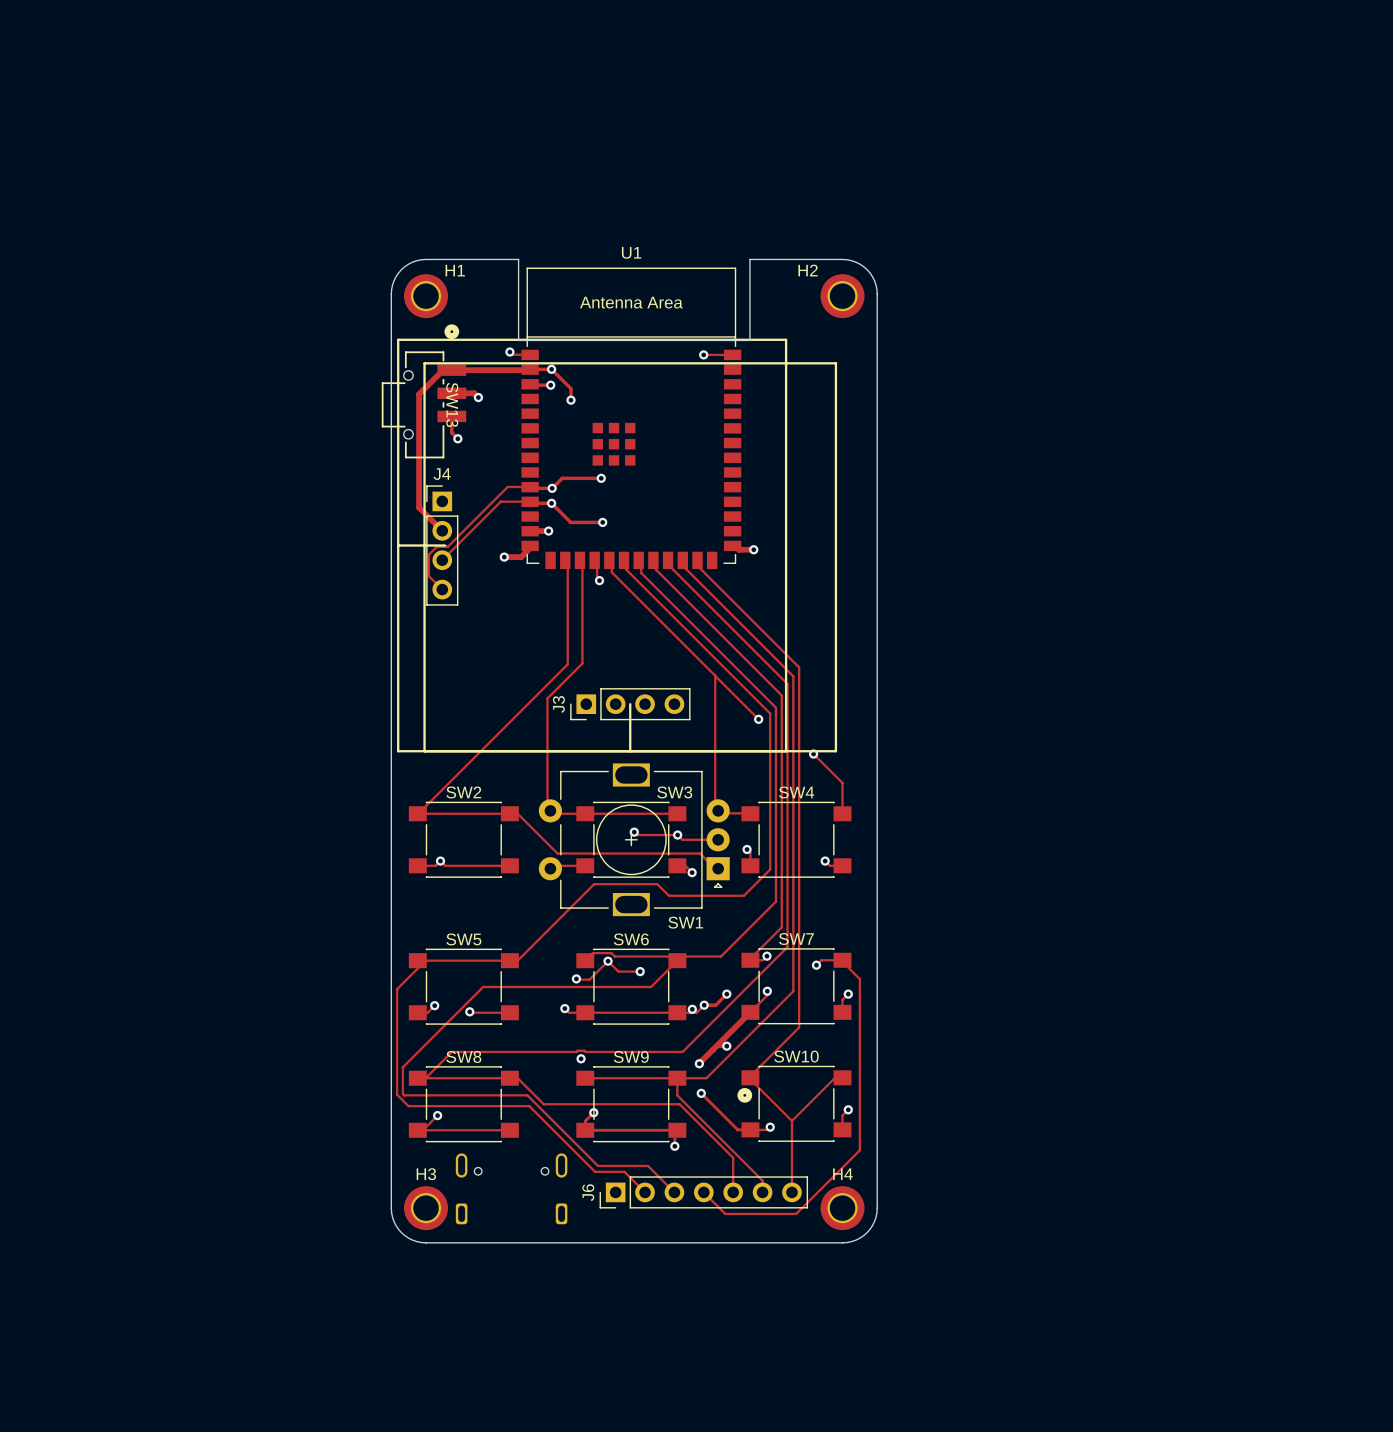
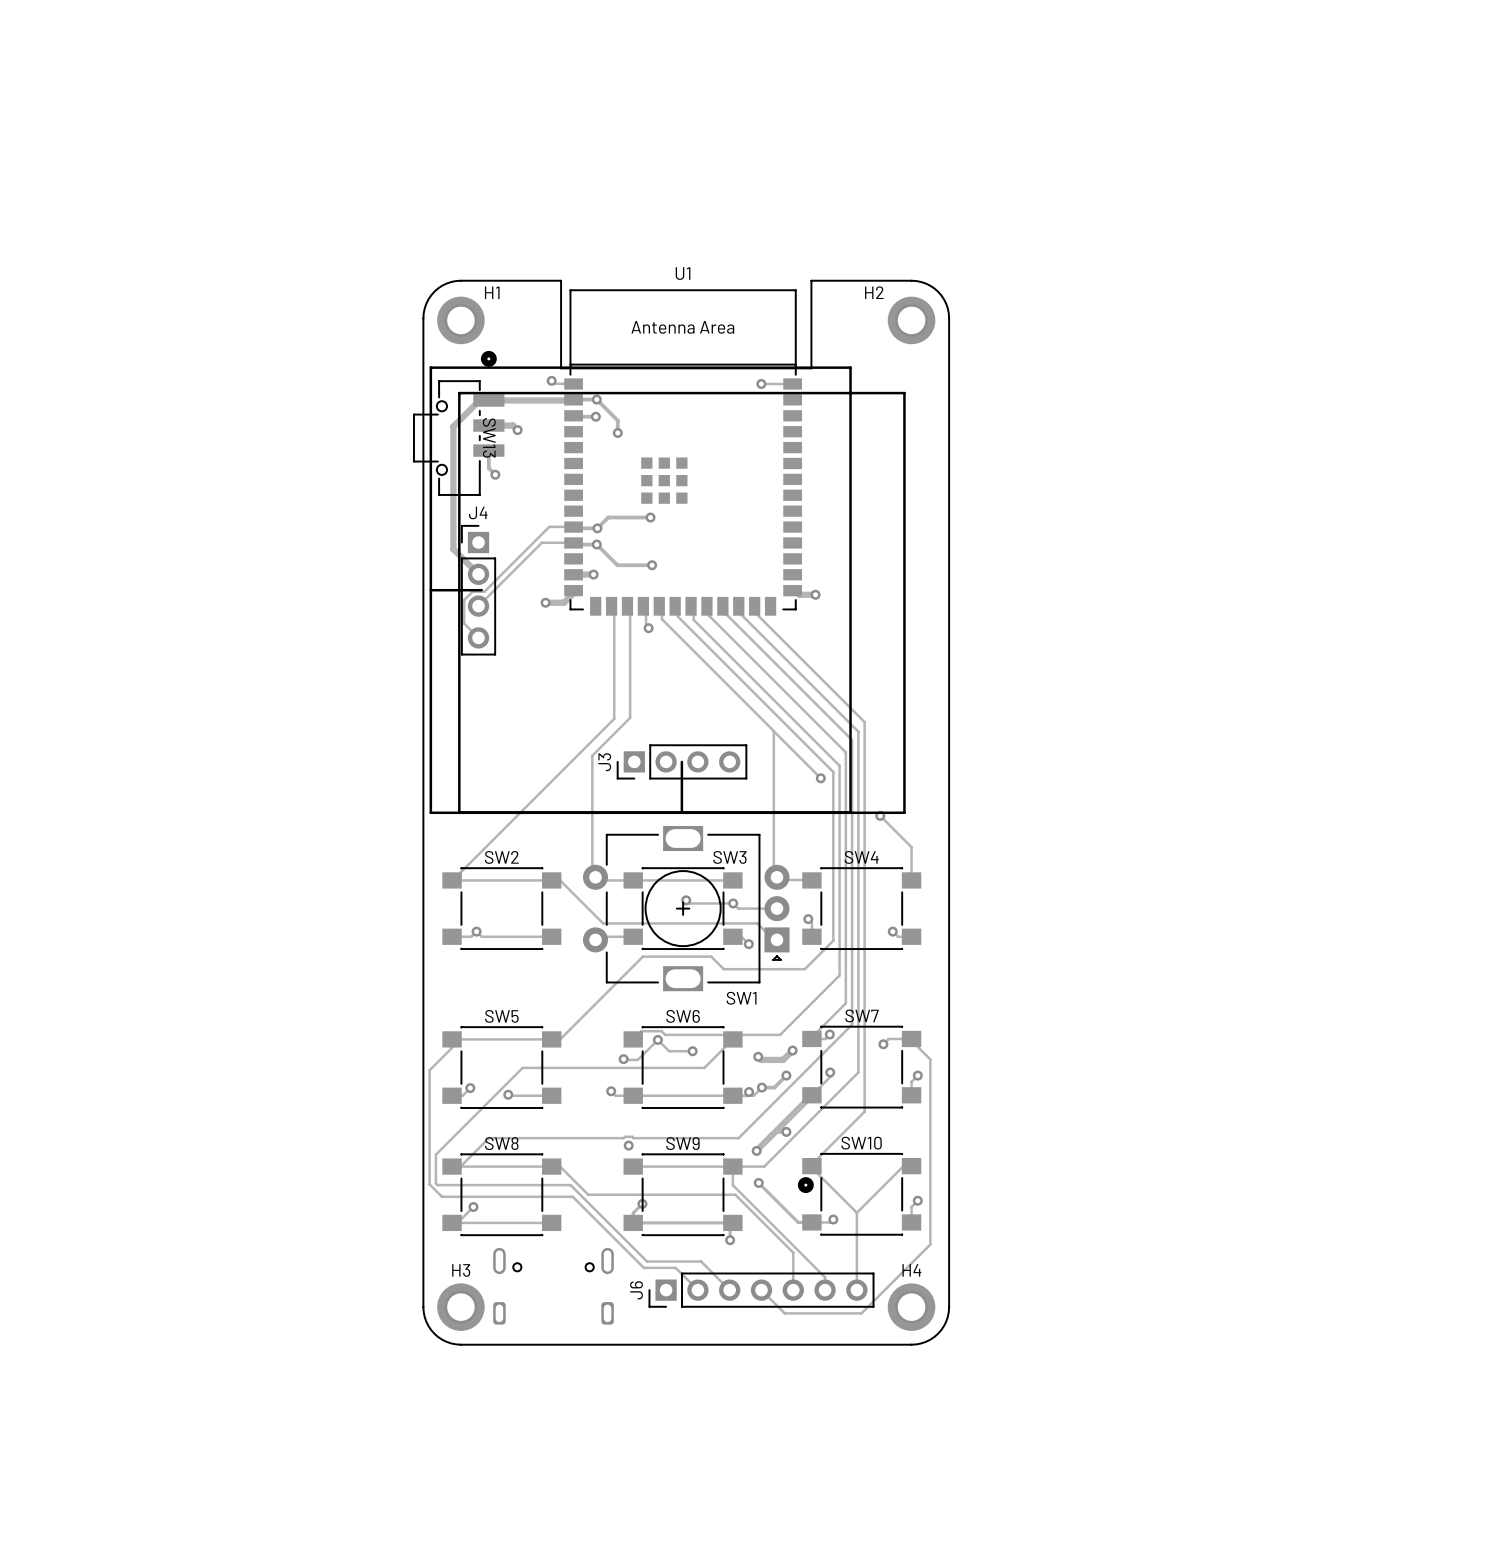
track: none -> (792, 1050) (783, 1059) (761, 1059) (758, 1056)
via: none -> (792, 1050)
via: none -> (758, 1056)

